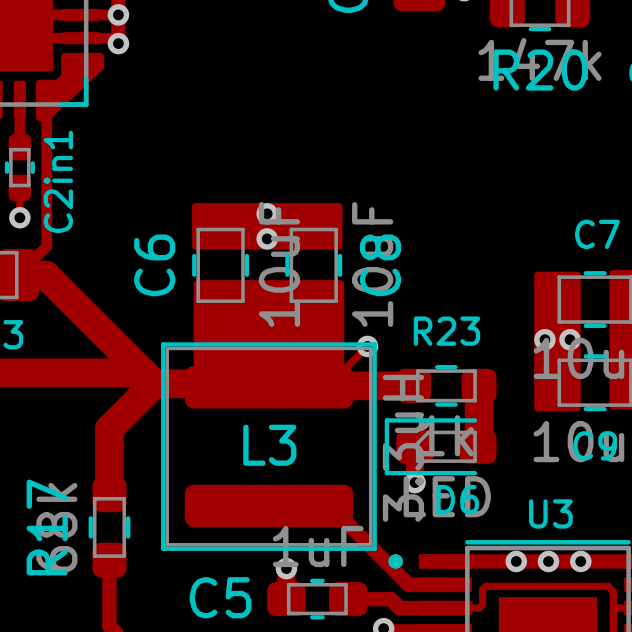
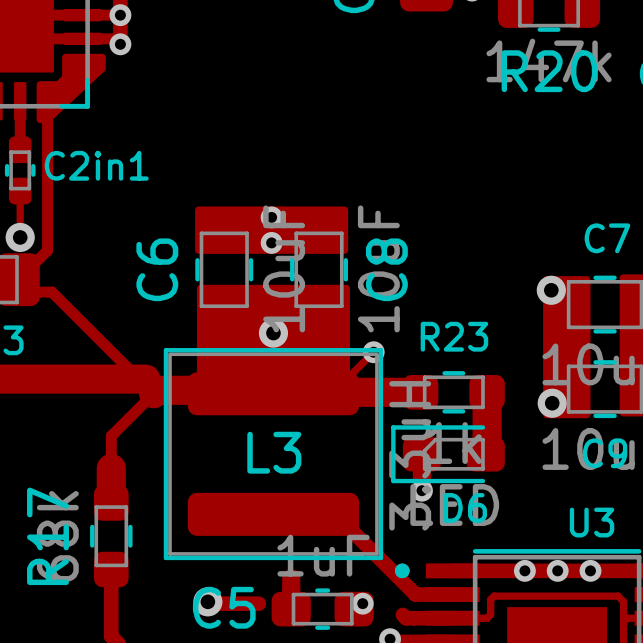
C2in1 name rotation: 0° (58, 181) -> 90° clockwise (96, 165)
via position: (19, 217) -> (20, 237)
track: (18, 275) (45, 275) (154, 383) -> (19, 279) (19, 292) (51, 292) (153, 393)
via: none -> (551, 290)
via: none -> (273, 333)
via: (544, 339) -> none
via: (570, 339) -> none
track width: thick (151, 387) (109, 428) (109, 460) -> thin (153, 393) (111, 436) (111, 468)
via: none -> (552, 403)
U3 name position: U3 (550, 513) -> U3 (592, 522)
via position: (286, 568) -> (362, 603)
track: none -> (207, 601) (209, 603) (258, 603)
via: none -> (207, 601)
track: (348, 599) (390, 599) (396, 604) -> none

